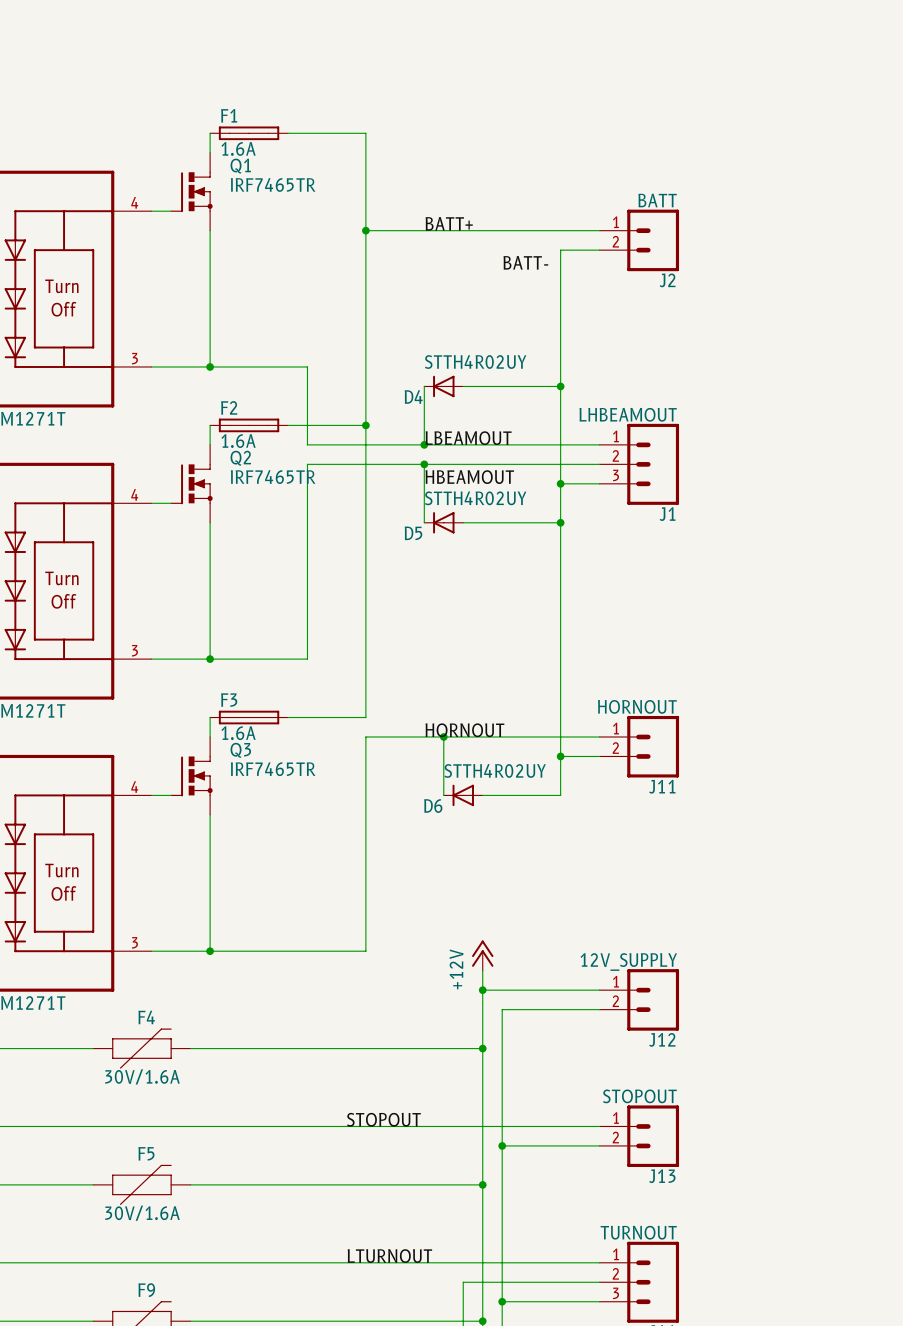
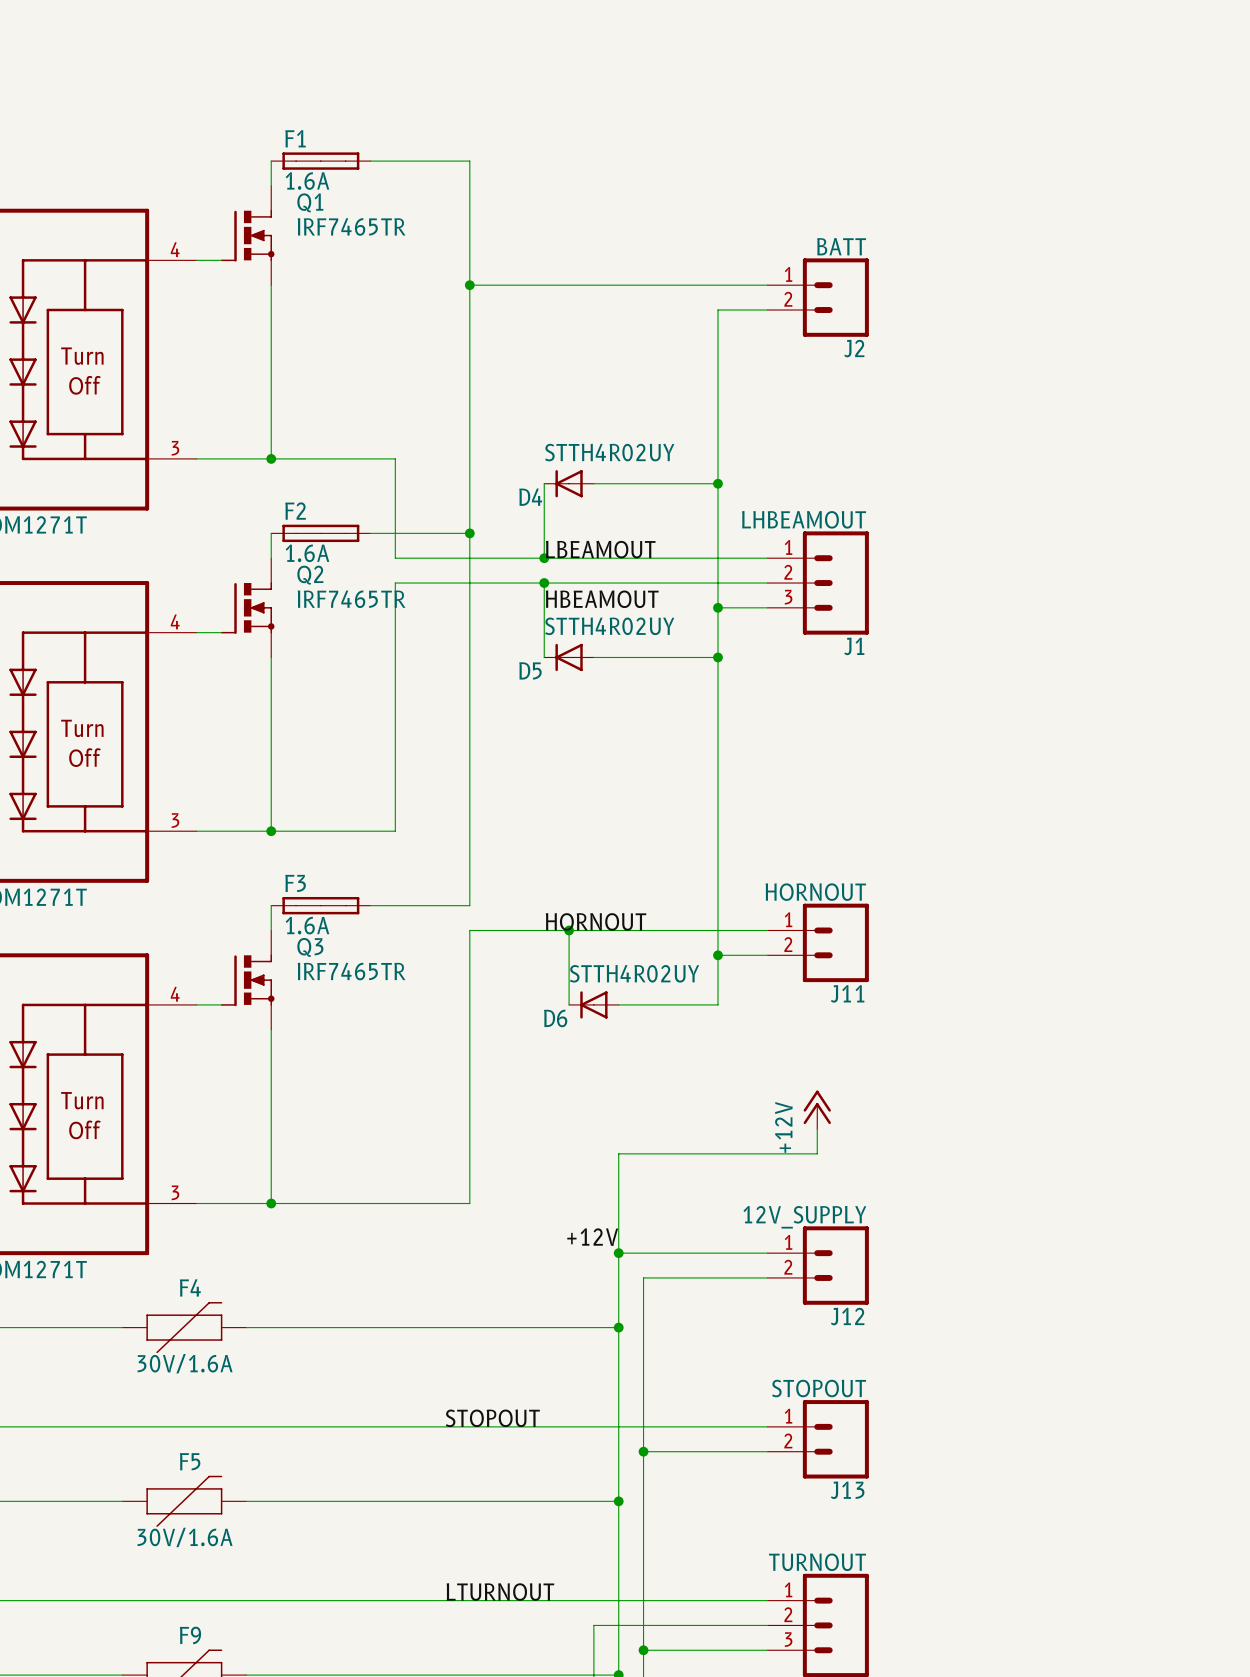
label: BATT+ (449, 223) -> none
label: BATT- (525, 262) -> none
wire: none -> (817, 1129) (817, 1153) (618, 1153) (618, 1228)
power symbol position: +12V (482, 955) -> +12V (817, 1109)
label: none -> +12V (592, 1237)

